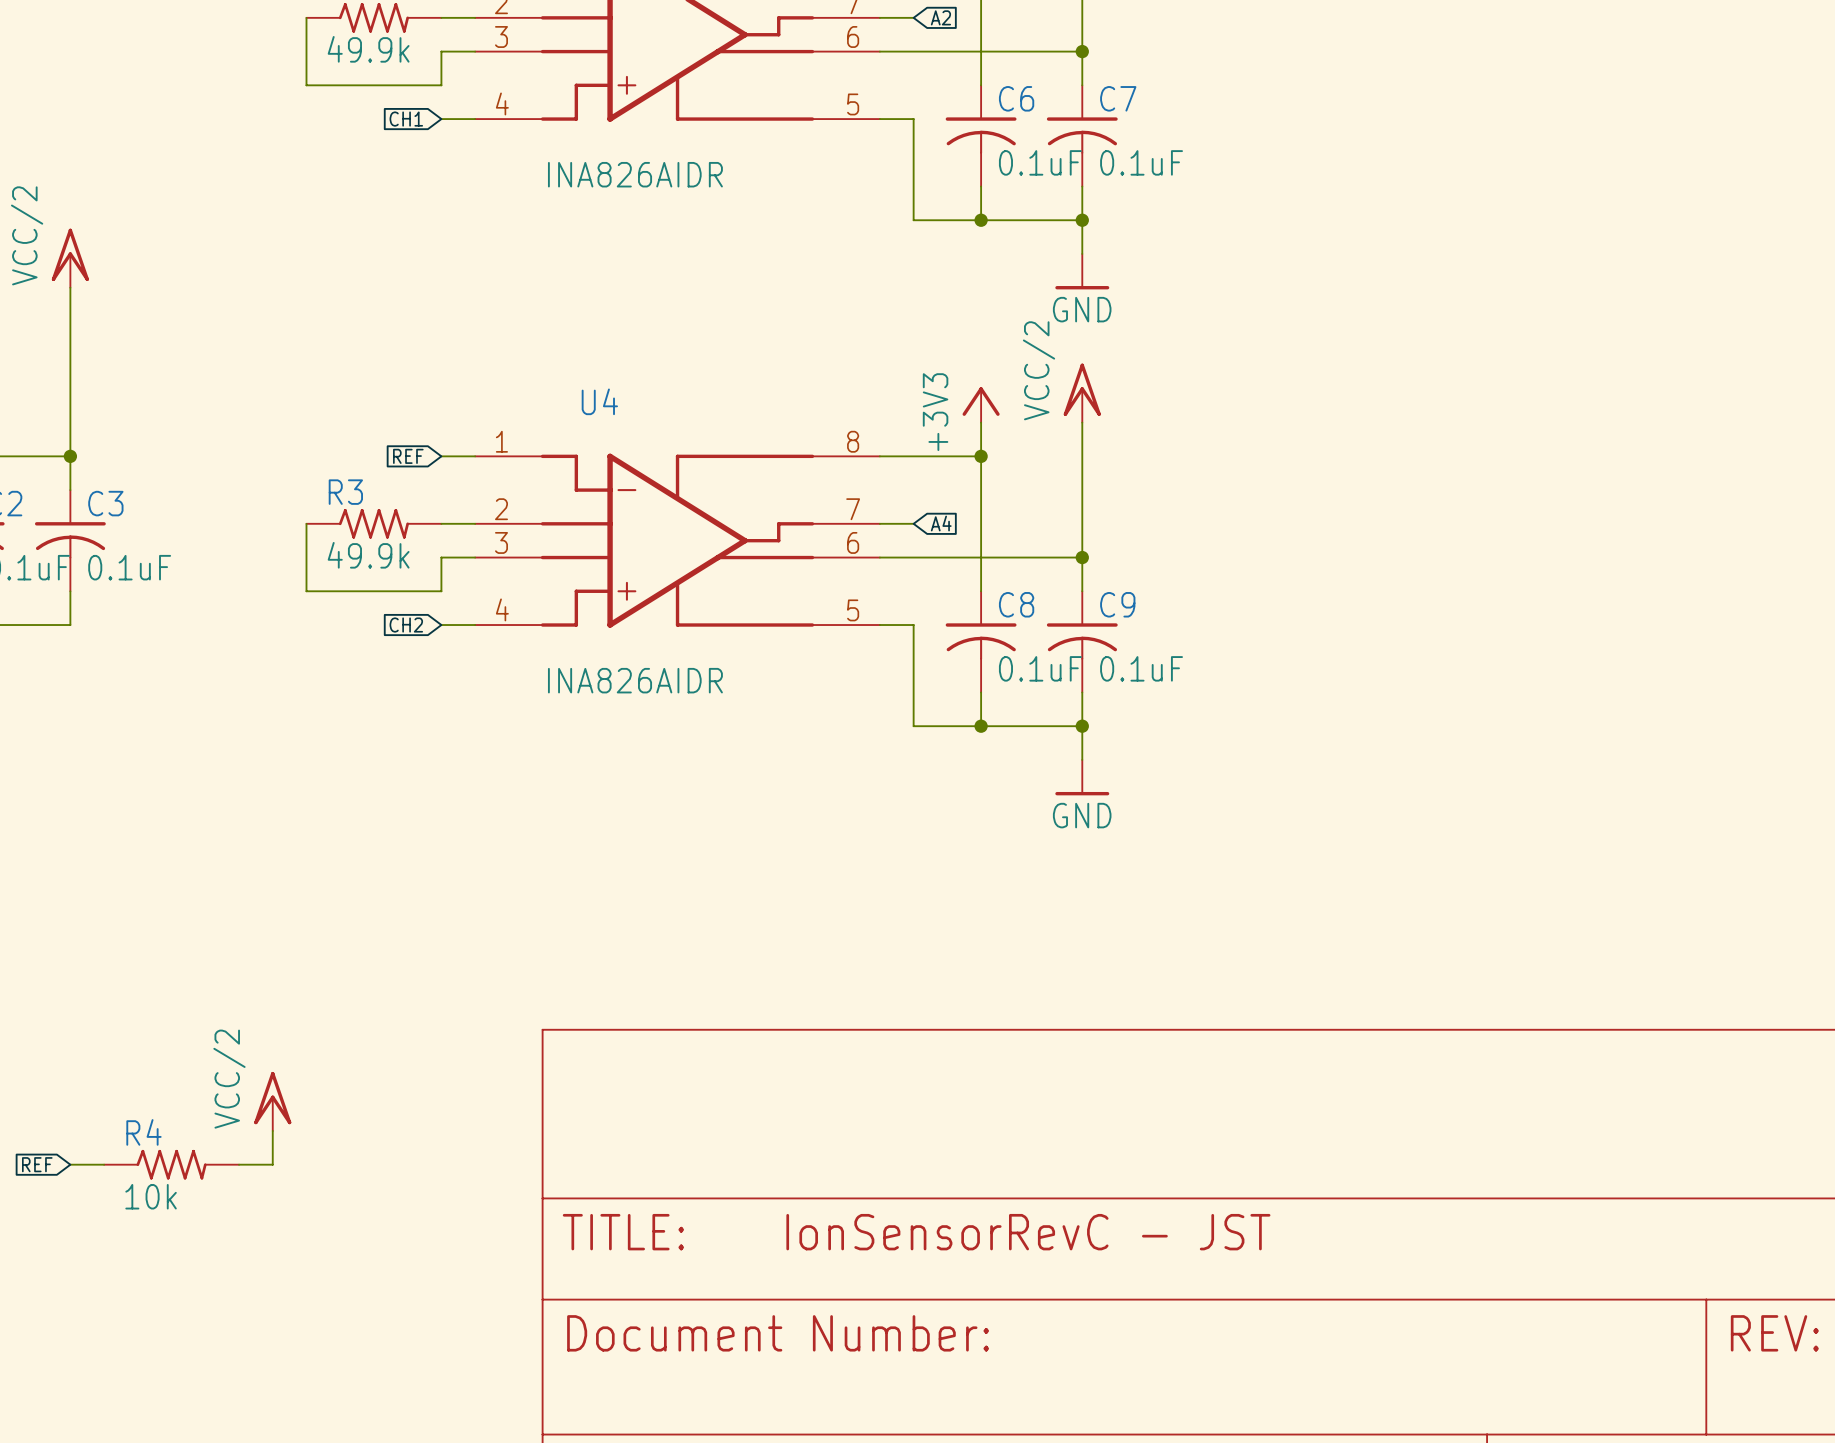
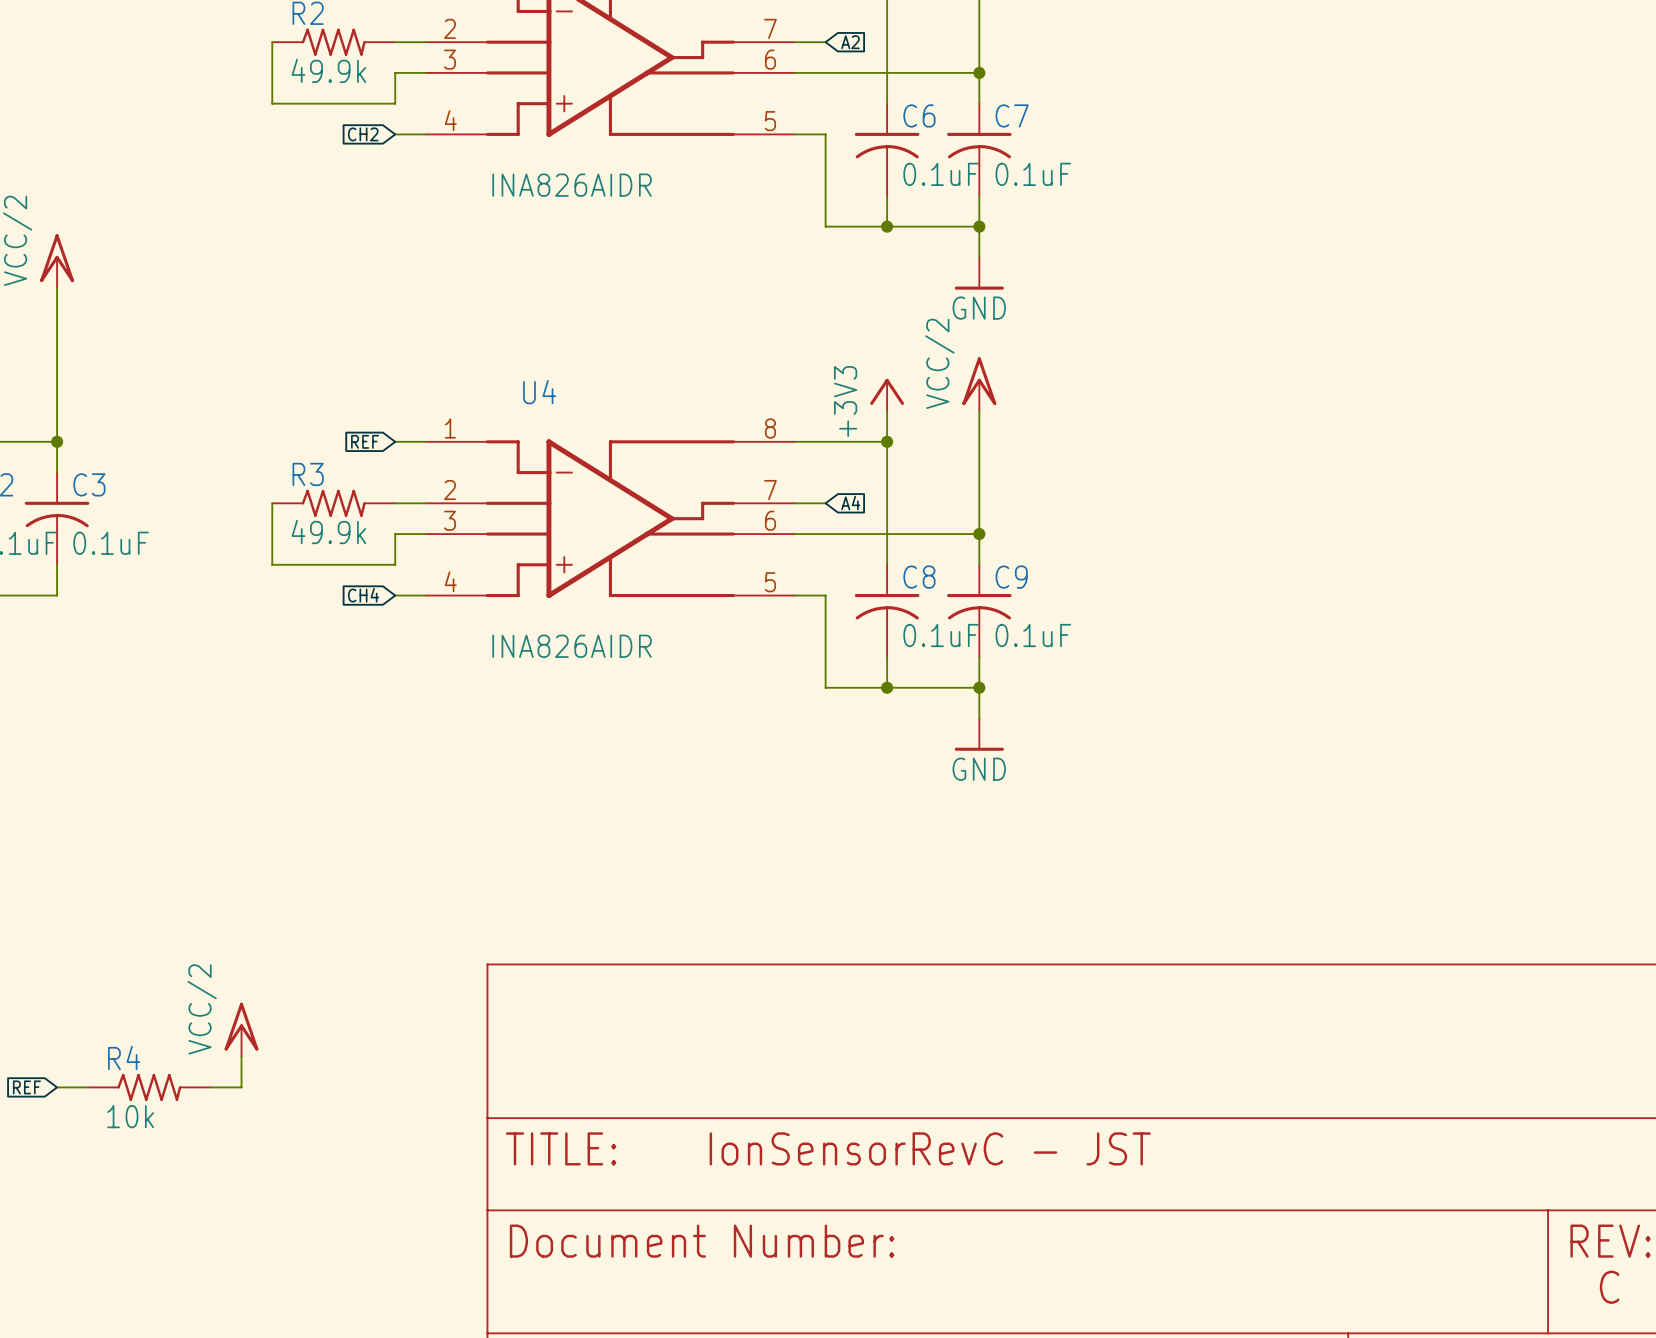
global label: CH1 (406, 119) -> CH2 (363, 134)
global label: CH2 (406, 625) -> CH4 (363, 595)
text: none -> C (1609, 1287)

